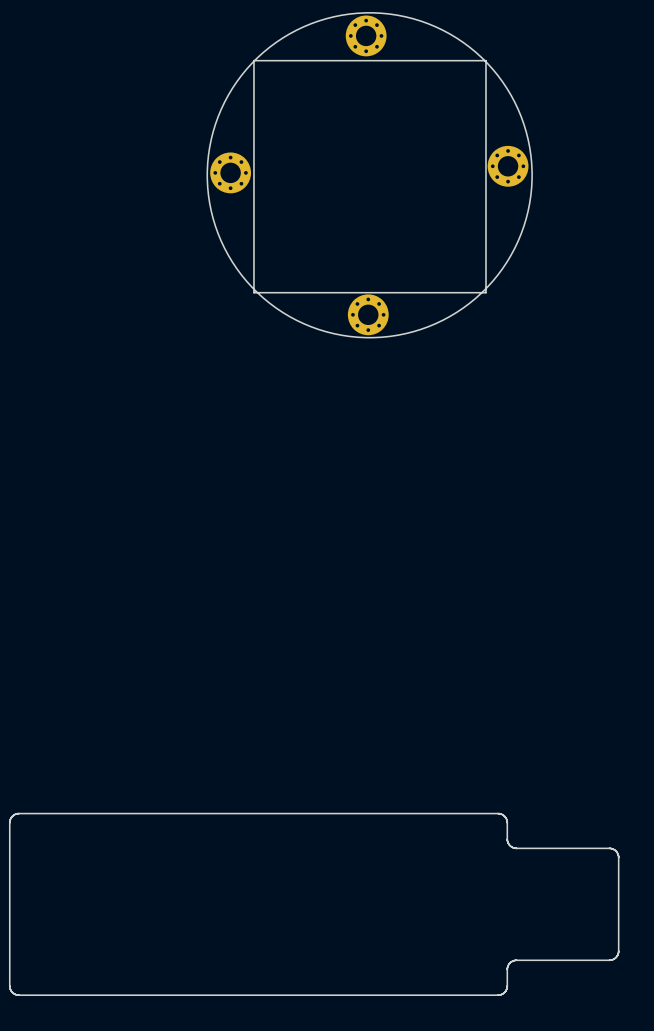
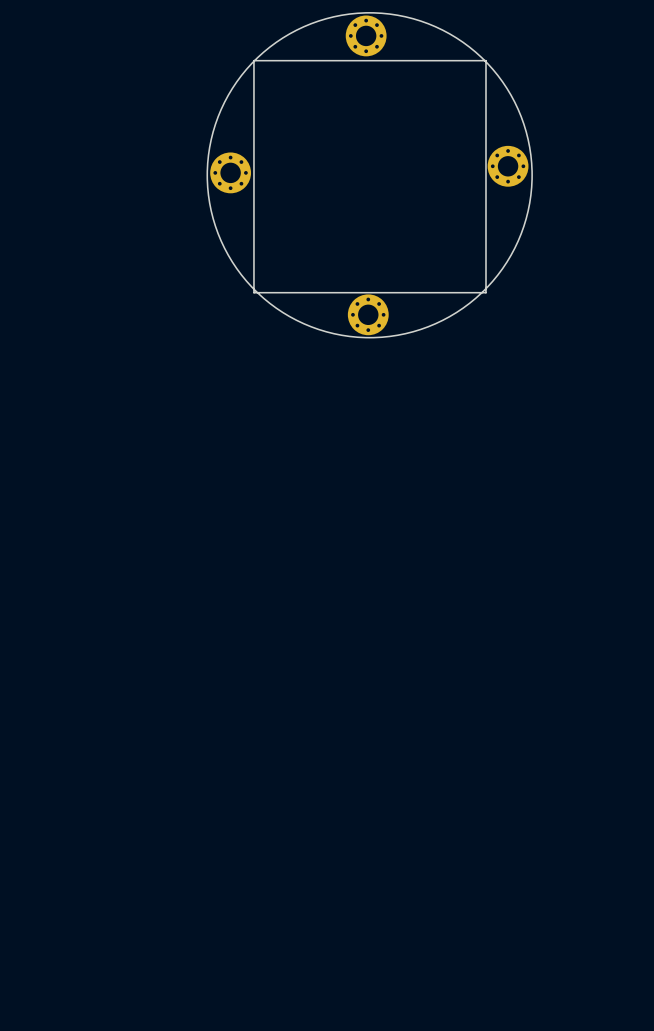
board edge: (498, 813) (506, 818) (507, 841) (513, 847) (609, 848) (616, 851) (618, 857) (618, 951) (615, 958) (609, 960) (513, 960) (507, 967) (506, 989) (498, 995) (19, 995) (13, 993) (10, 989) (9, 822) (11, 817) (15, 814) (498, 813) -> none

